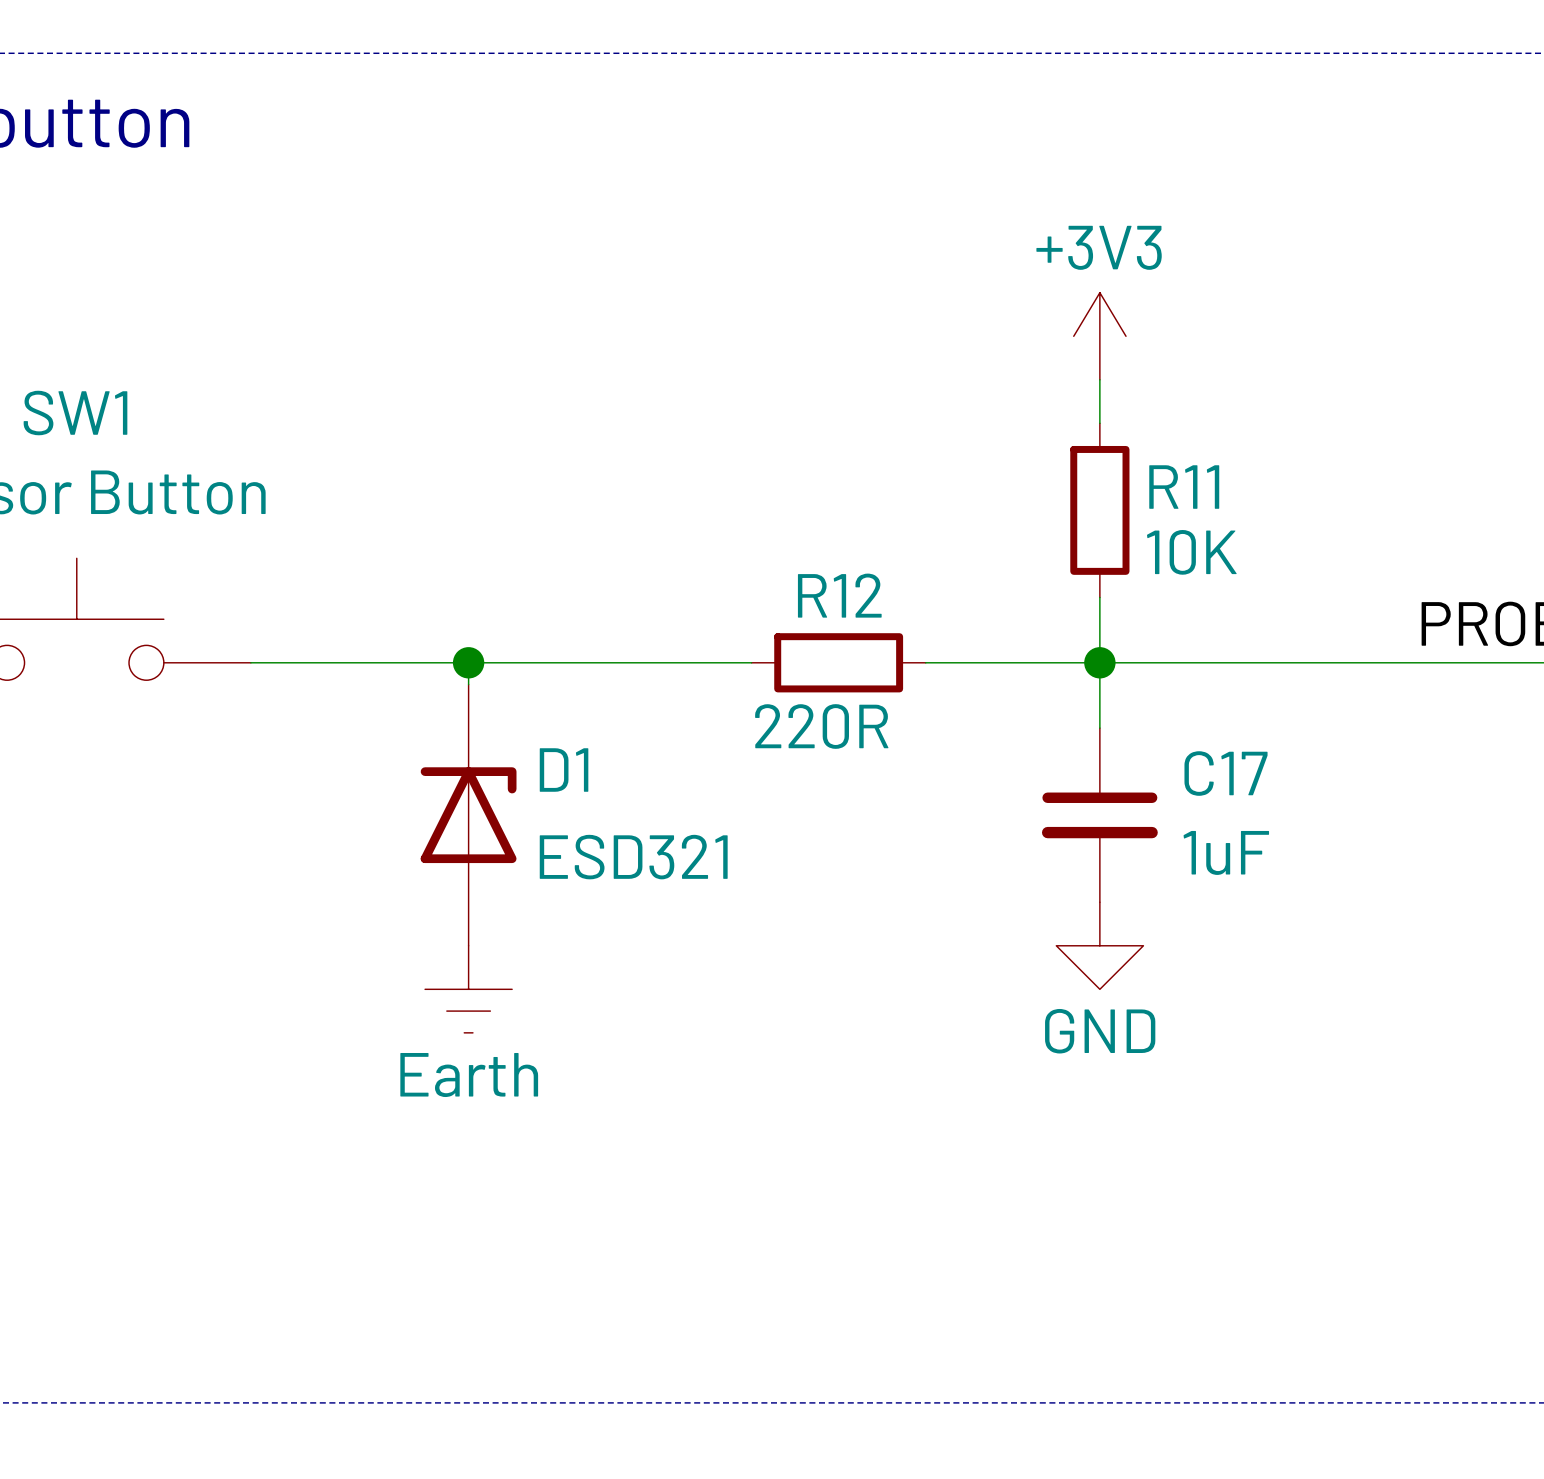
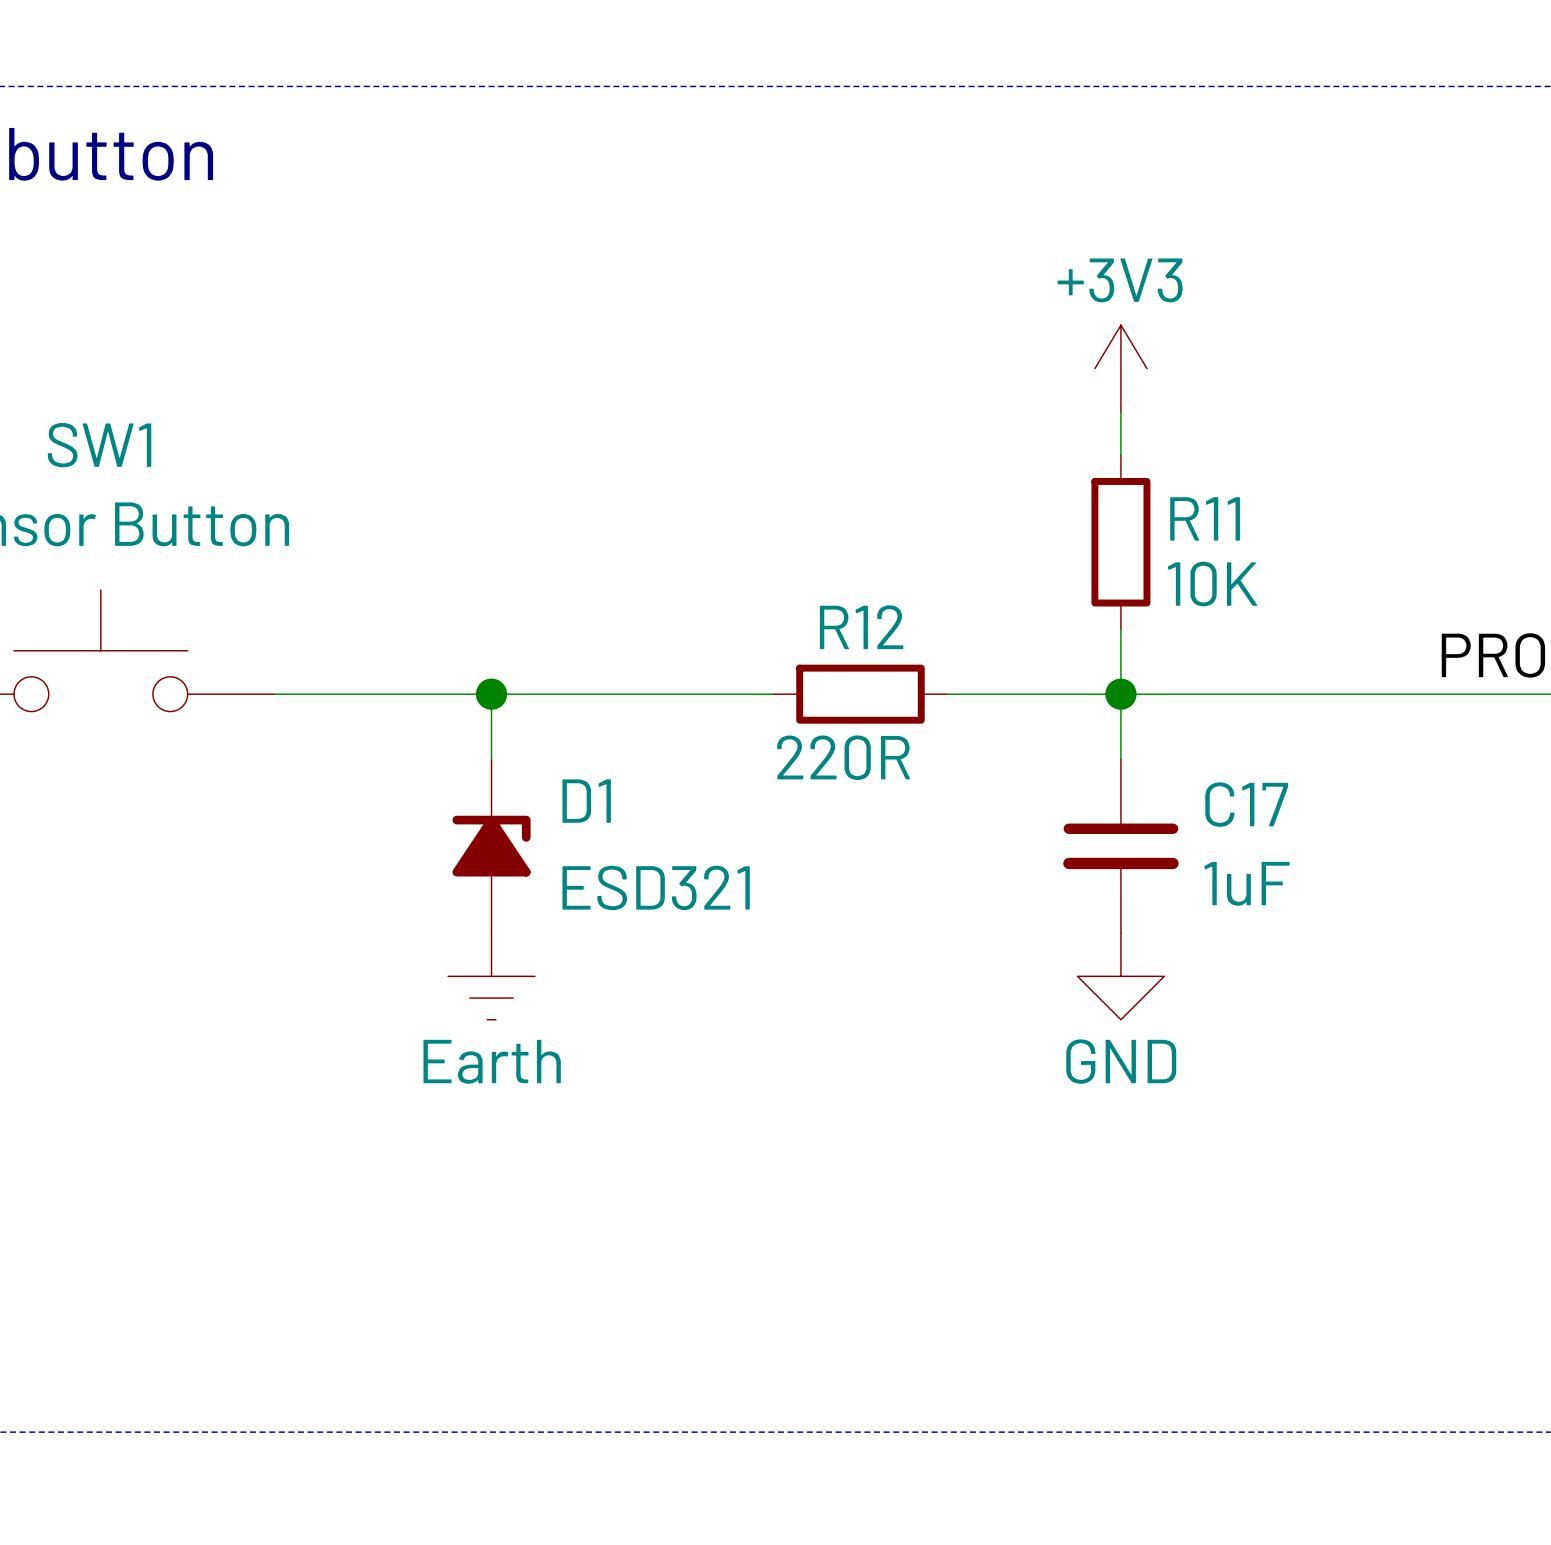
D1 symbol: [420, 684, 517, 946] -> [452, 759, 531, 933]
power symbol position: Earth (468, 989) -> Earth (491, 976)

